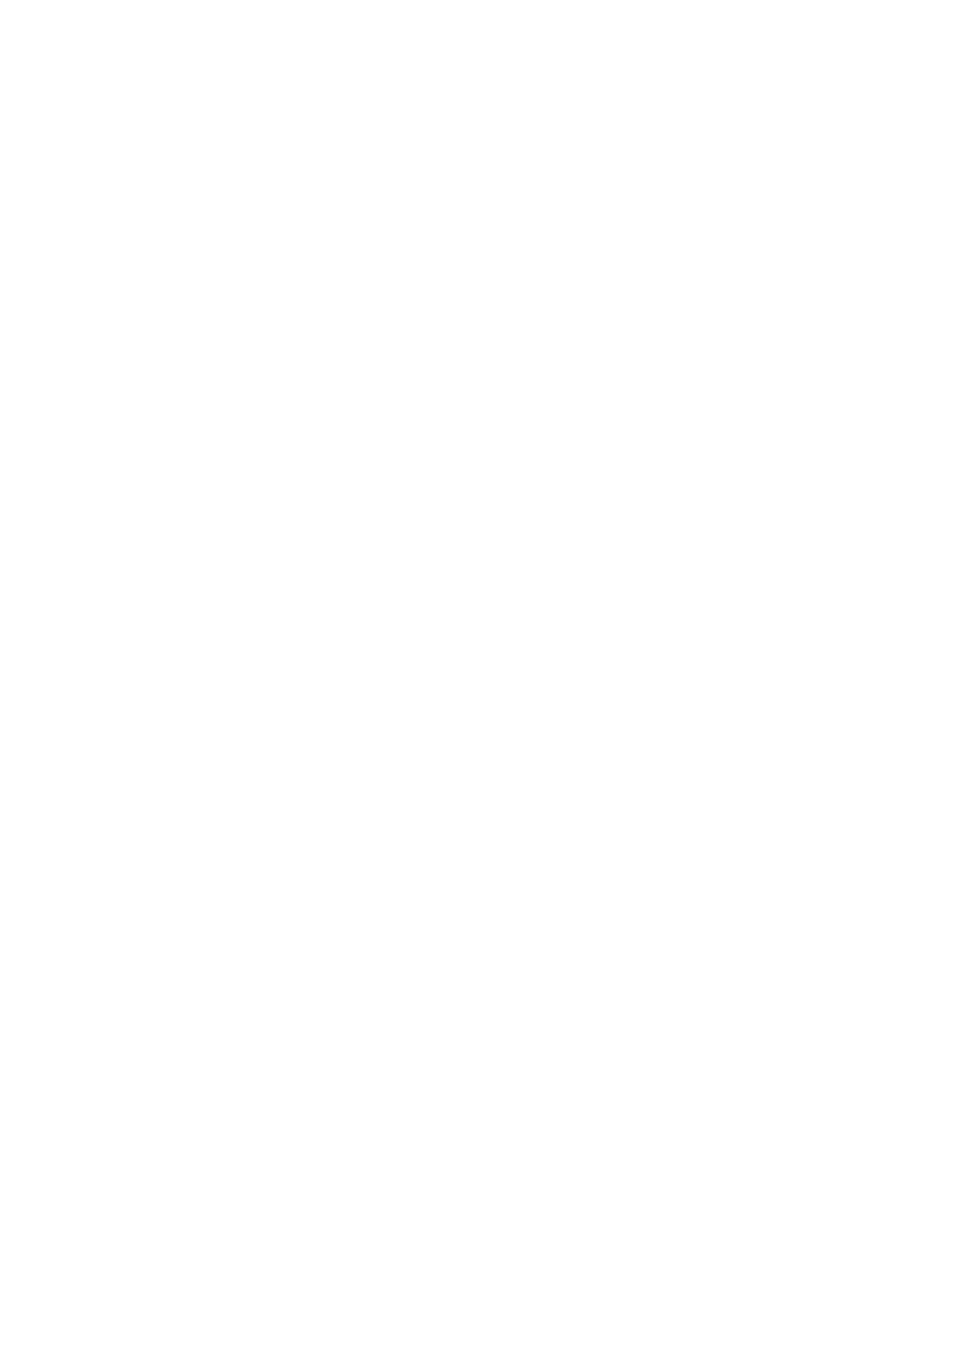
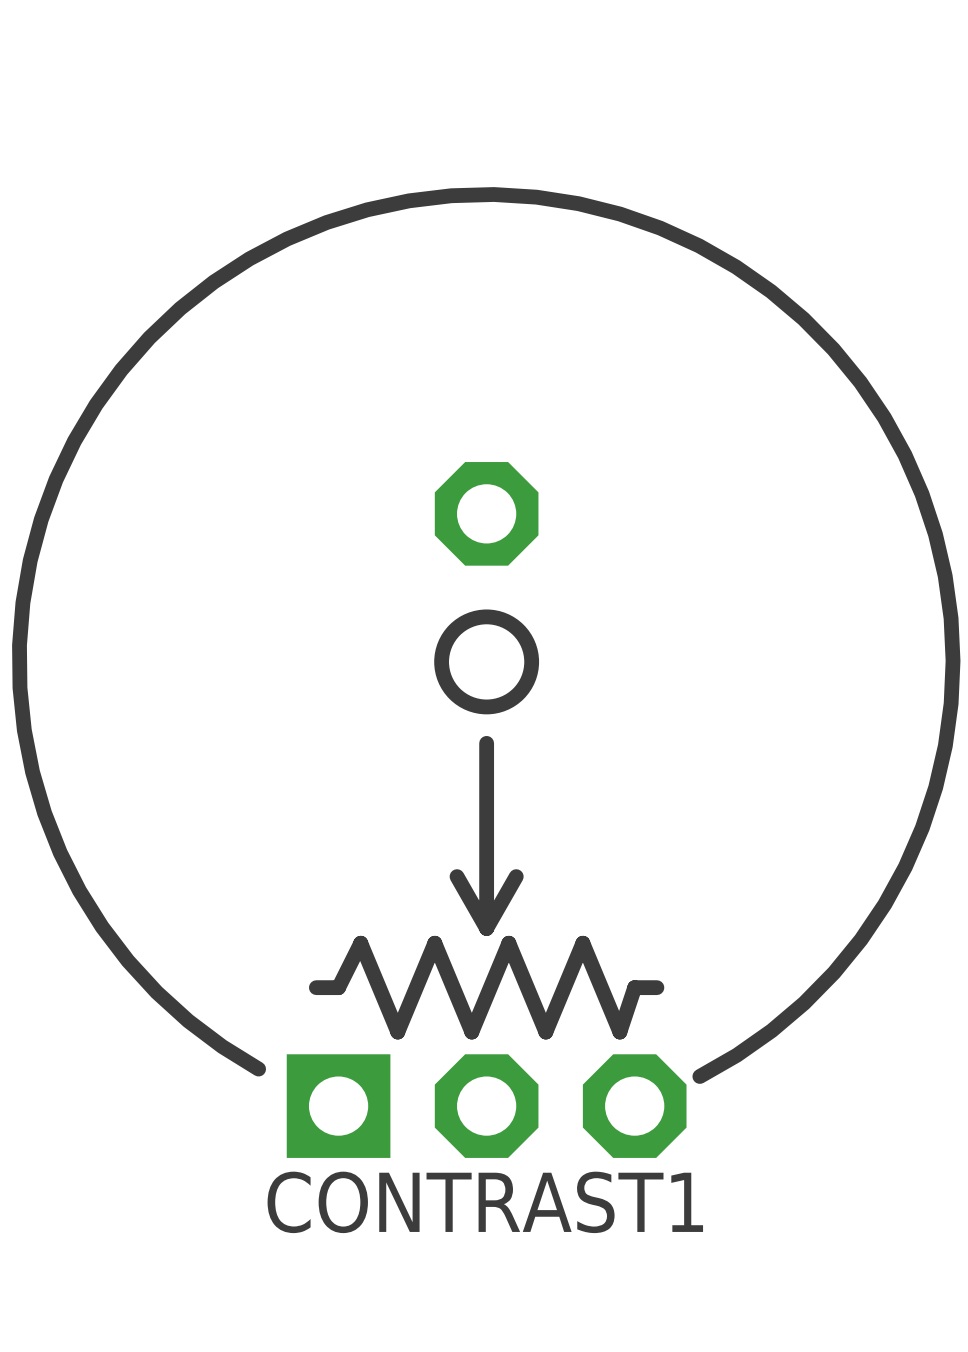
CONTRAST1: none -> (486, 672)

